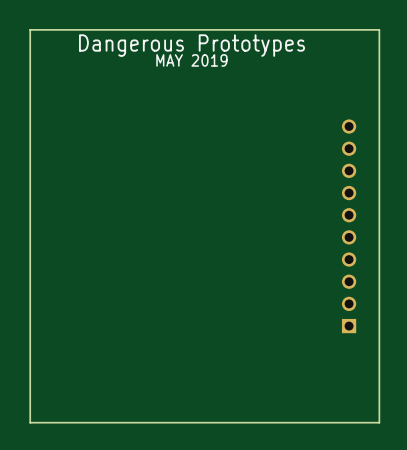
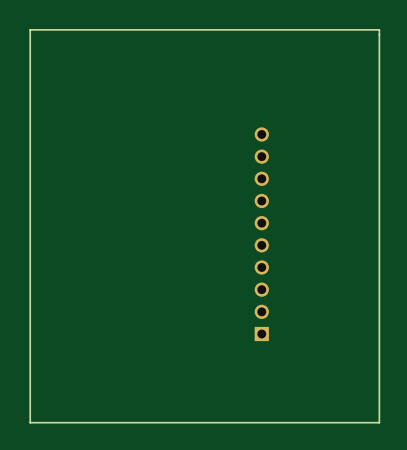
text: Dangerous Prototypes (192, 45) -> none
text: MAY 2019 (191, 60) -> none
part position: (349, 226) -> (261, 234)

